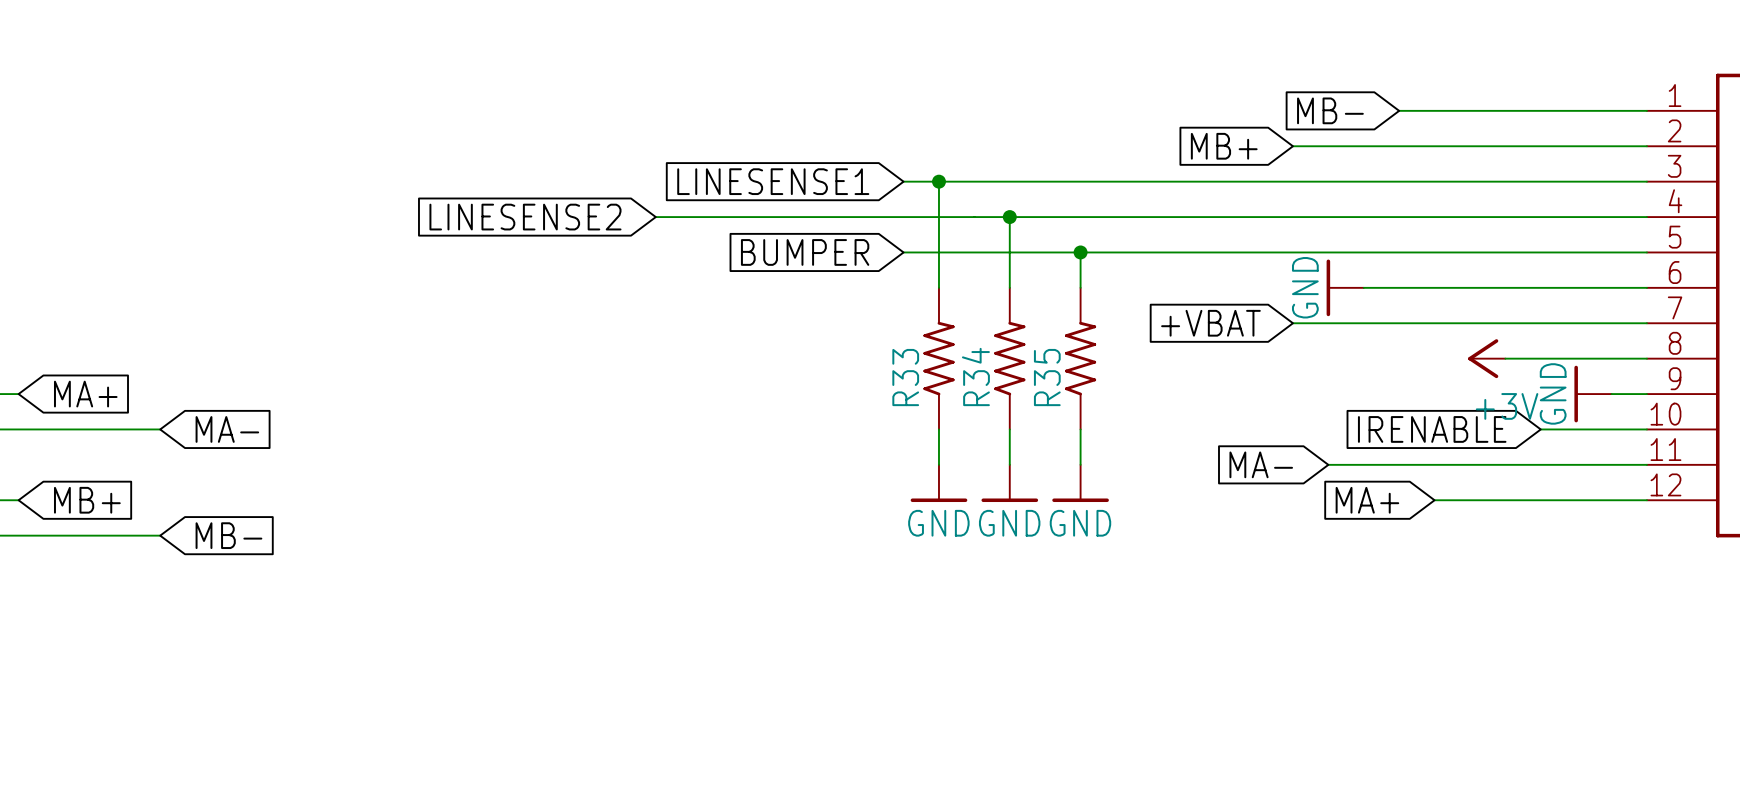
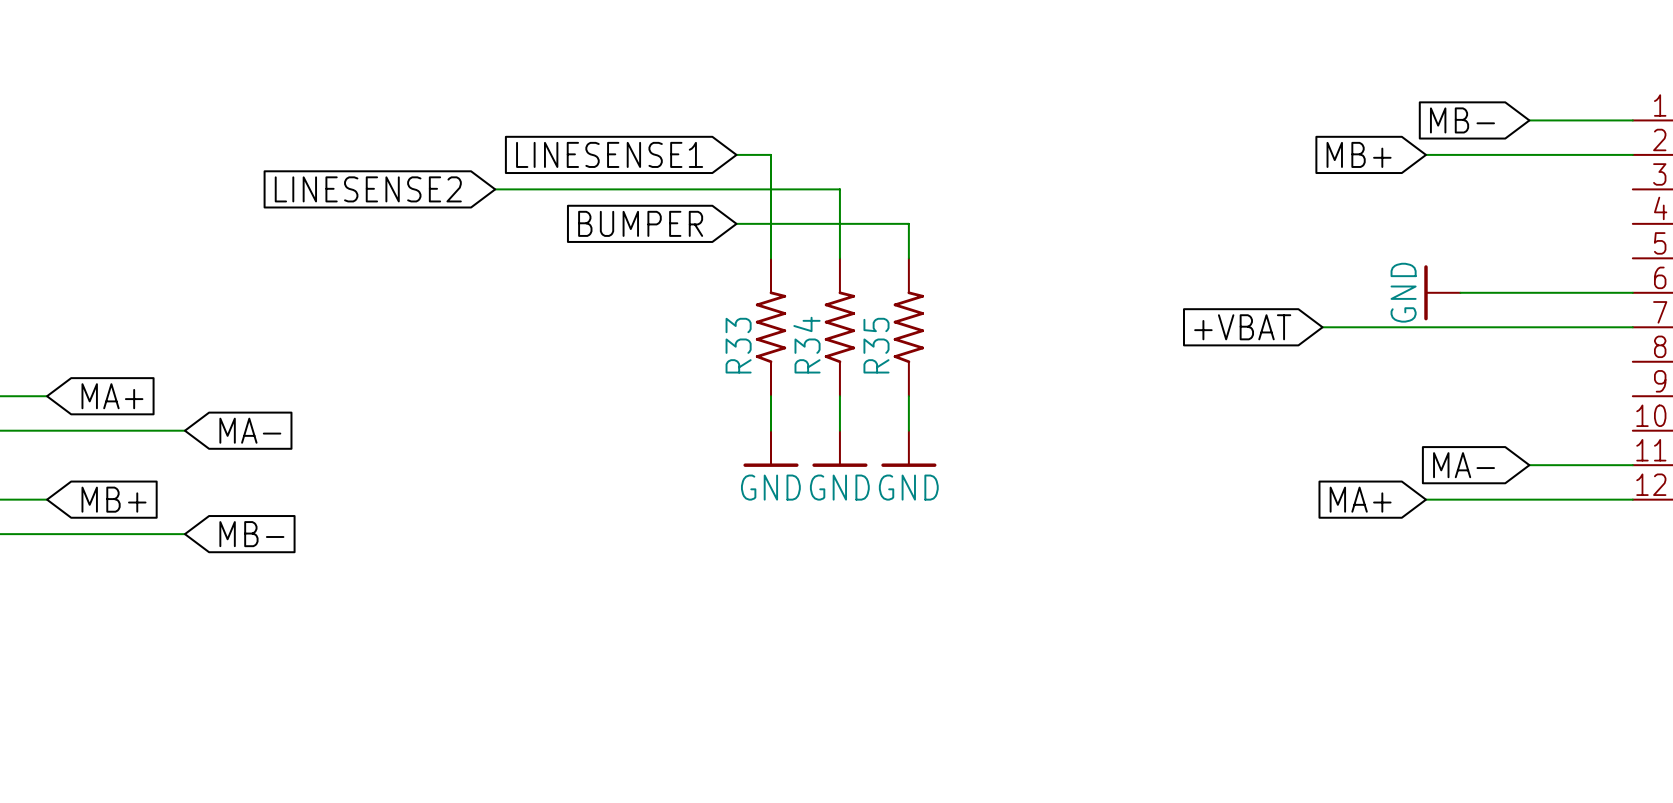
global label position: MB- (1330, 110) -> MB- (1462, 120)
wire: (1399, 110) (1540, 110) -> none
wire: none -> (736, 154) (771, 154) (771, 258)
global label position: MB+ (1224, 146) -> MB+ (1359, 154)
wire: (1292, 146) (1434, 146) -> none
wire: none -> (495, 189) (839, 189) (839, 258)
global label position: LINESENSE1 (773, 181) -> LINESENSE1 (609, 154)
wire: (903, 181) (1646, 181) -> none
wire: (938, 181) (938, 287) -> none
junction: (938, 181) -> none
global label position: LINESENSE2 (525, 217) -> LINESENSE2 (368, 189)
wire: (655, 217) (726, 217) -> none
wire: (903, 217) (1646, 217) -> (908, 223) (908, 258)
wire: (1009, 217) (1009, 287) -> none
junction: (1009, 217) -> none
global label position: BUMPER (805, 252) -> BUMPER (640, 223)
wire: (903, 252) (1646, 252) -> none
wire: (1080, 252) (1080, 287) -> none
junction: (1080, 252) -> none
power symbol: GND (1345, 287) -> none
wire: (1363, 287) (1469, 287) -> none
power symbol: none -> GND (1442, 292)
global label position: +VBAT (1210, 323) -> +VBAT (1242, 327)
wire: (1292, 323) (1328, 323) -> none
R33 position: (938, 358) -> (771, 327)
R34 position: (1009, 358) -> (839, 327)
R35 position: (1080, 358) -> (908, 327)
power symbol: +3V (1486, 358) -> none
wire: (1505, 358) (1646, 358) -> none
power symbol: GND (1592, 394) -> none
wire: (1611, 394) (1646, 394) -> none
wire: (938, 429) (938, 464) -> (771, 396) (771, 430)
wire: (1009, 429) (1009, 464) -> (839, 396) (839, 430)
wire: (1080, 429) (1080, 464) -> (908, 396) (908, 430)
global label: IRENABLE (1432, 429) -> none
wire: (1540, 429) (1646, 429) -> none
power symbol: none -> GND (771, 448)
power symbol: none -> GND (839, 448)
global label position: MA- (1261, 464) -> MA- (1464, 465)
wire: (1328, 464) (1540, 464) -> none
power symbol position: GND (938, 483) -> GND (908, 448)
power symbol: GND (1009, 483) -> none
power symbol: GND (1080, 483) -> none

